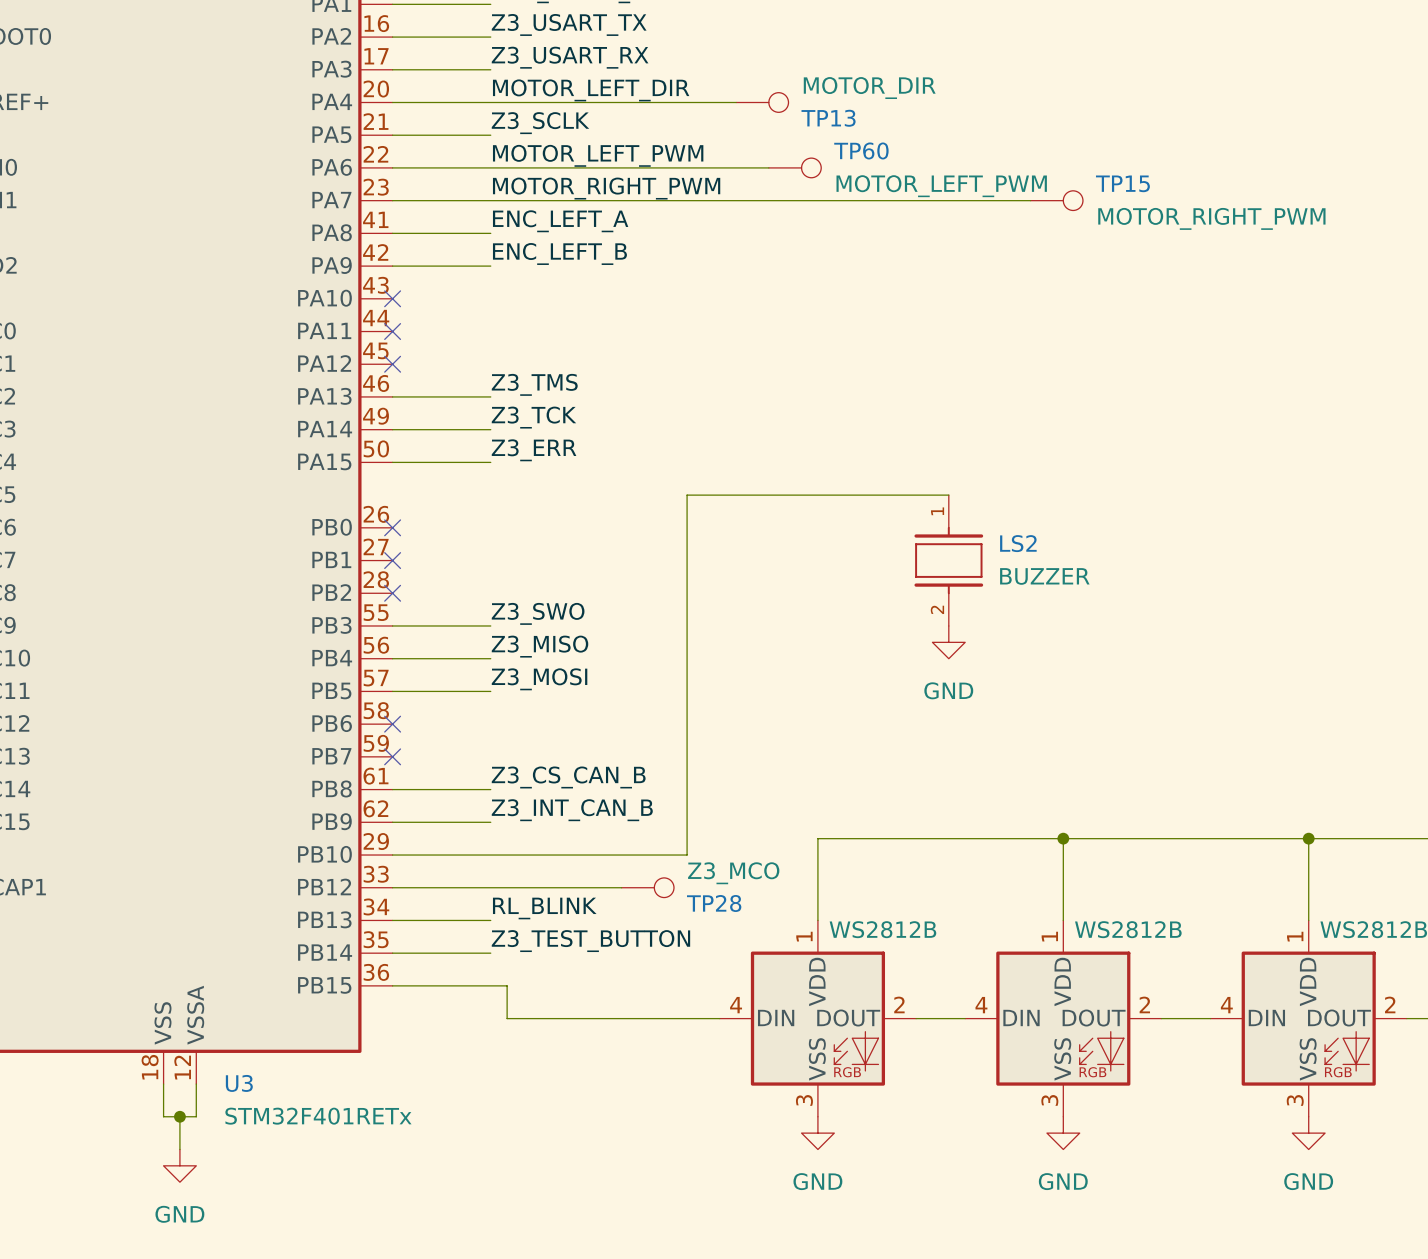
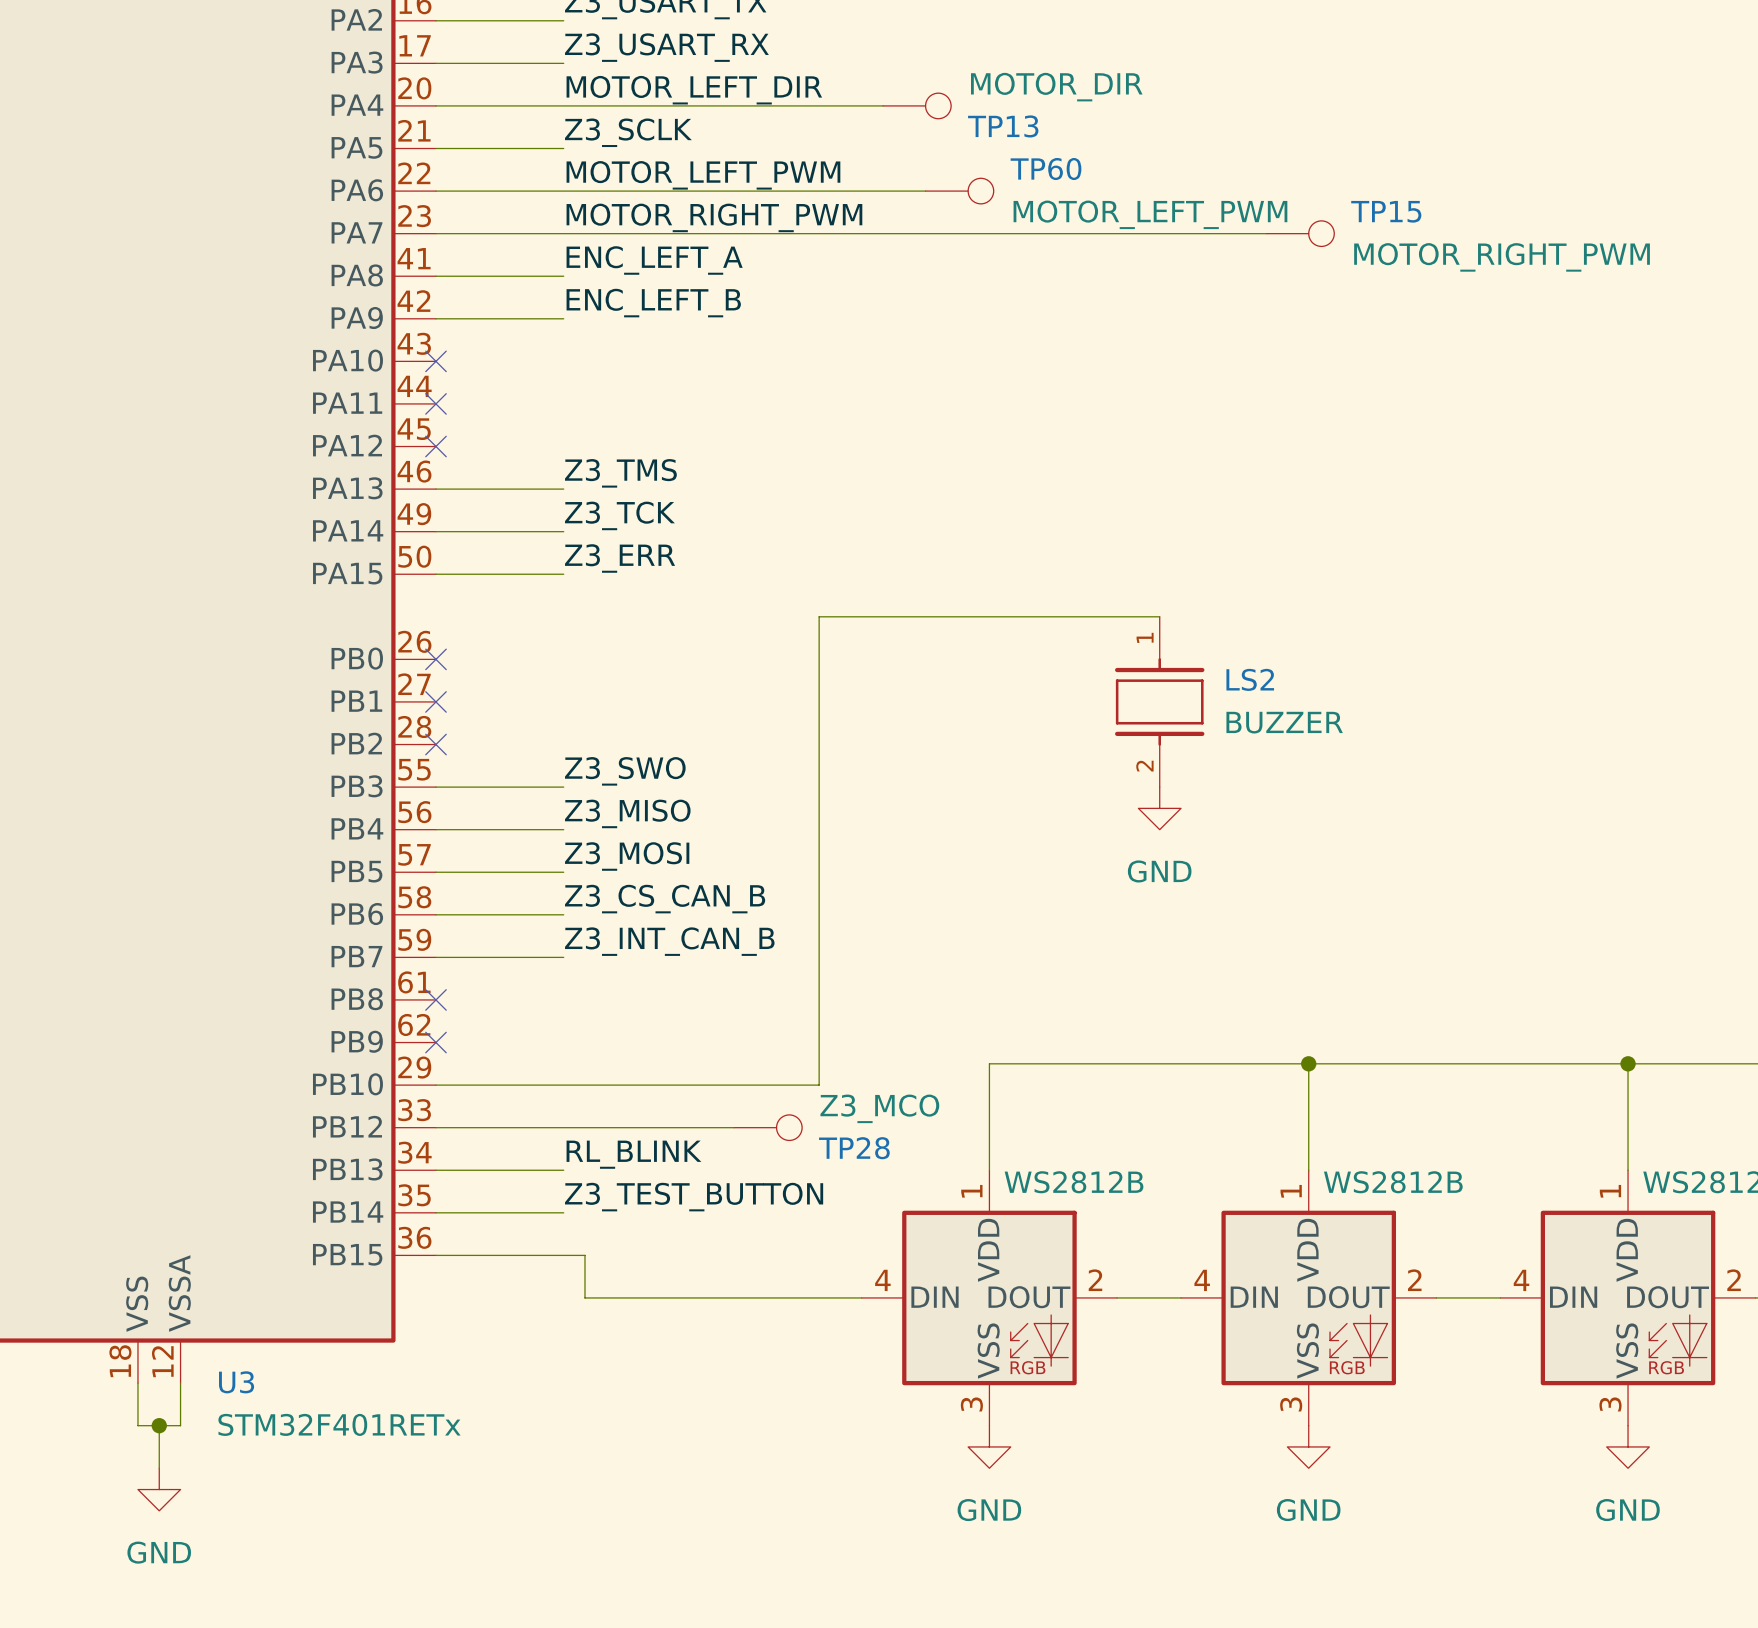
no-connect mark: (392, 724) -> none
no-connect mark: (392, 756) -> none
label position: Z3_CS_CAN_B (568, 777) -> Z3_CS_CAN_B (665, 899)
wire: (392, 789) (490, 789) -> (435, 957) (563, 957)
no-connect mark: none -> (435, 999)
label position: Z3_INT_CAN_B (572, 810) -> Z3_INT_CAN_B (669, 941)
wire: (392, 822) (490, 822) -> (435, 914) (563, 914)
no-connect mark: none -> (435, 1042)

